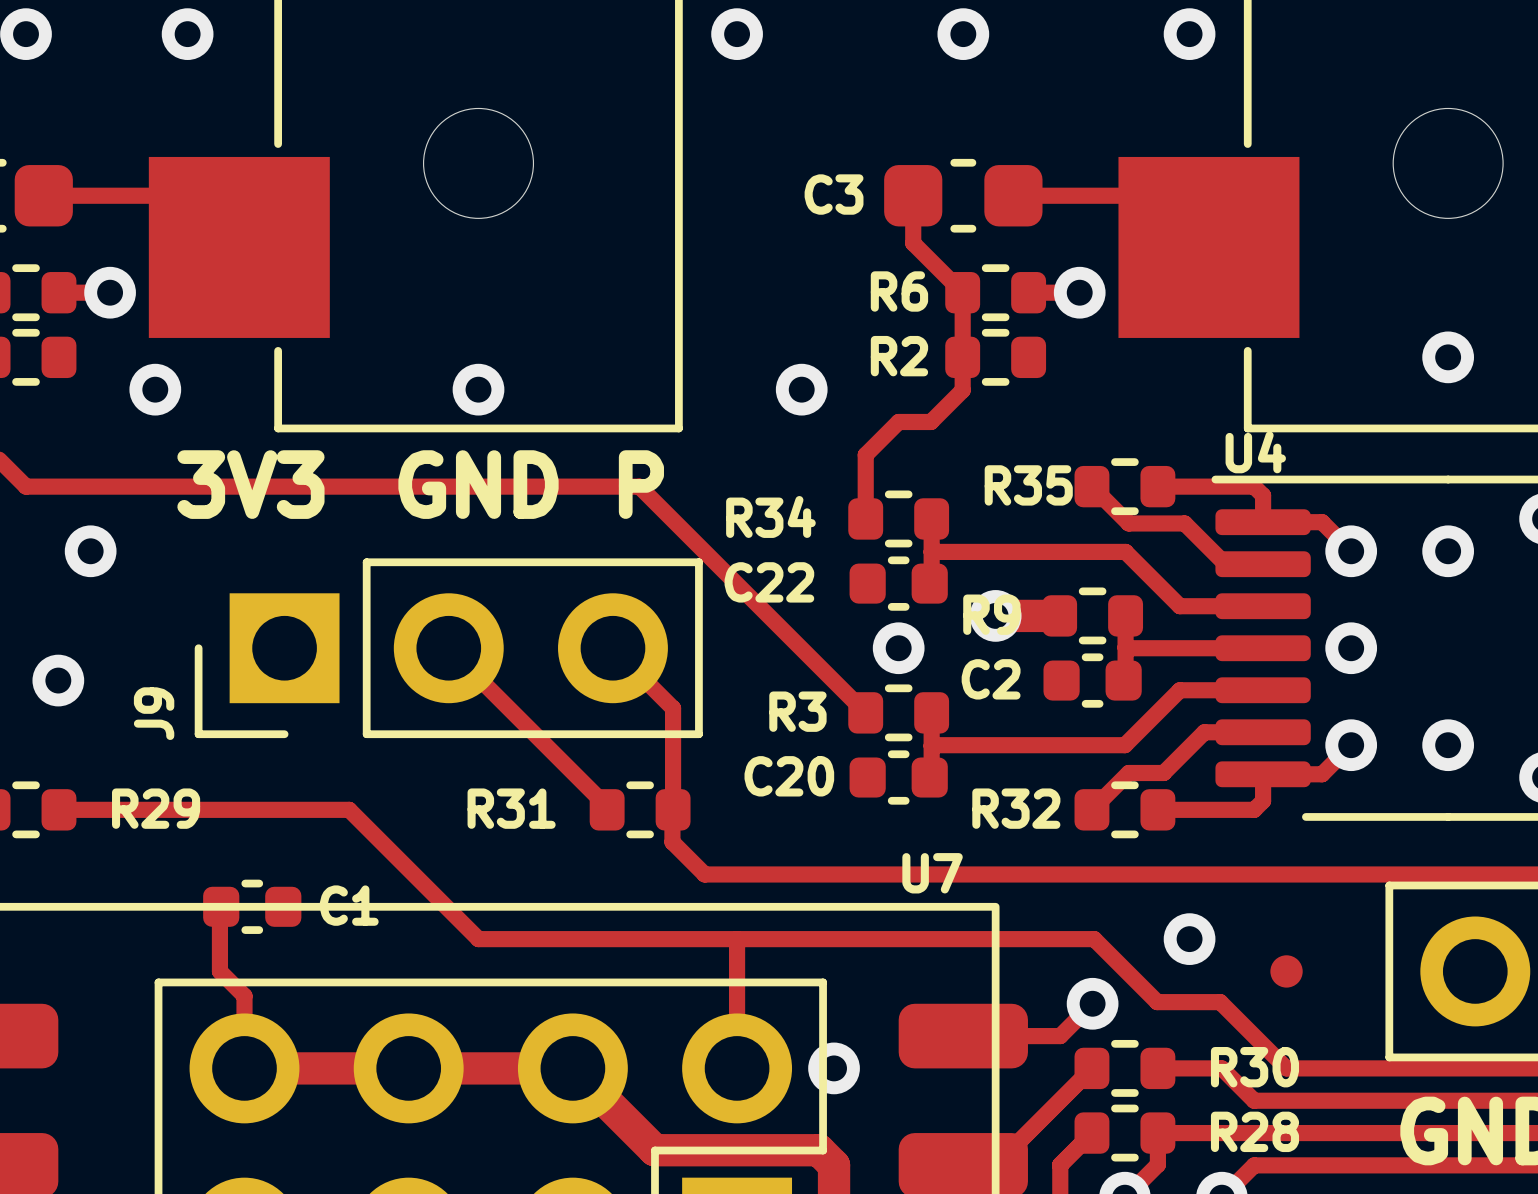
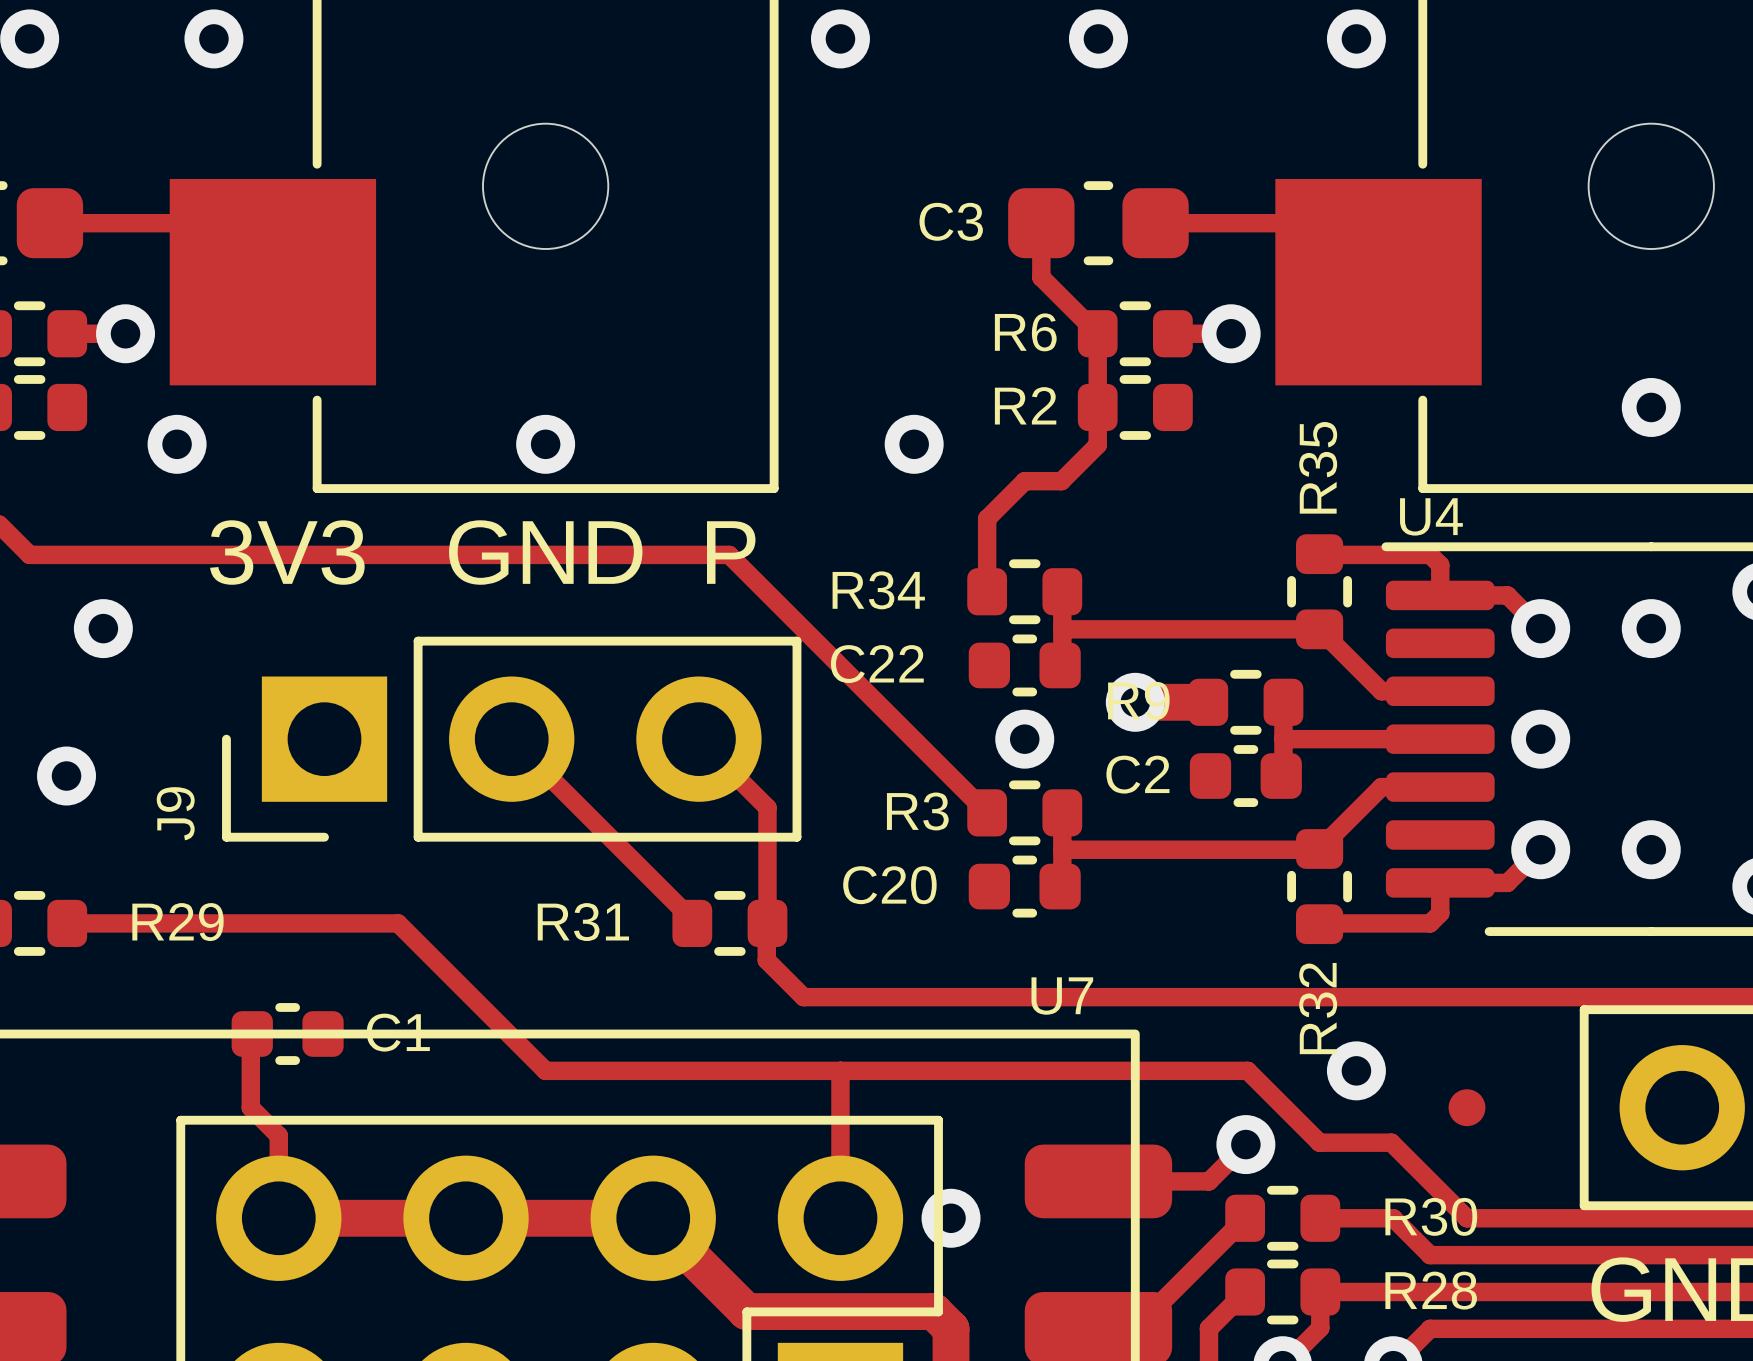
track: (1091, 486) (1128, 523) (1184, 523) (1225, 564) -> none
R35 rotation: 0° (1124, 486) -> 90° clockwise (1319, 591)
track: (1125, 551) (1179, 606) (1211, 606) -> (1283, 629) (1319, 629) (1381, 691)
track: (1211, 690) (1179, 690) (1124, 745) -> (1381, 787) (1318, 849) (1282, 849)
track: (1263, 732) (1204, 732) (1163, 772) (1128, 772) (1091, 809) -> none
R32 name position: R32 (1016, 808) -> R32 (1318, 1008)
R32 rotation: 0° (1124, 809) -> 90° clockwise (1319, 886)

